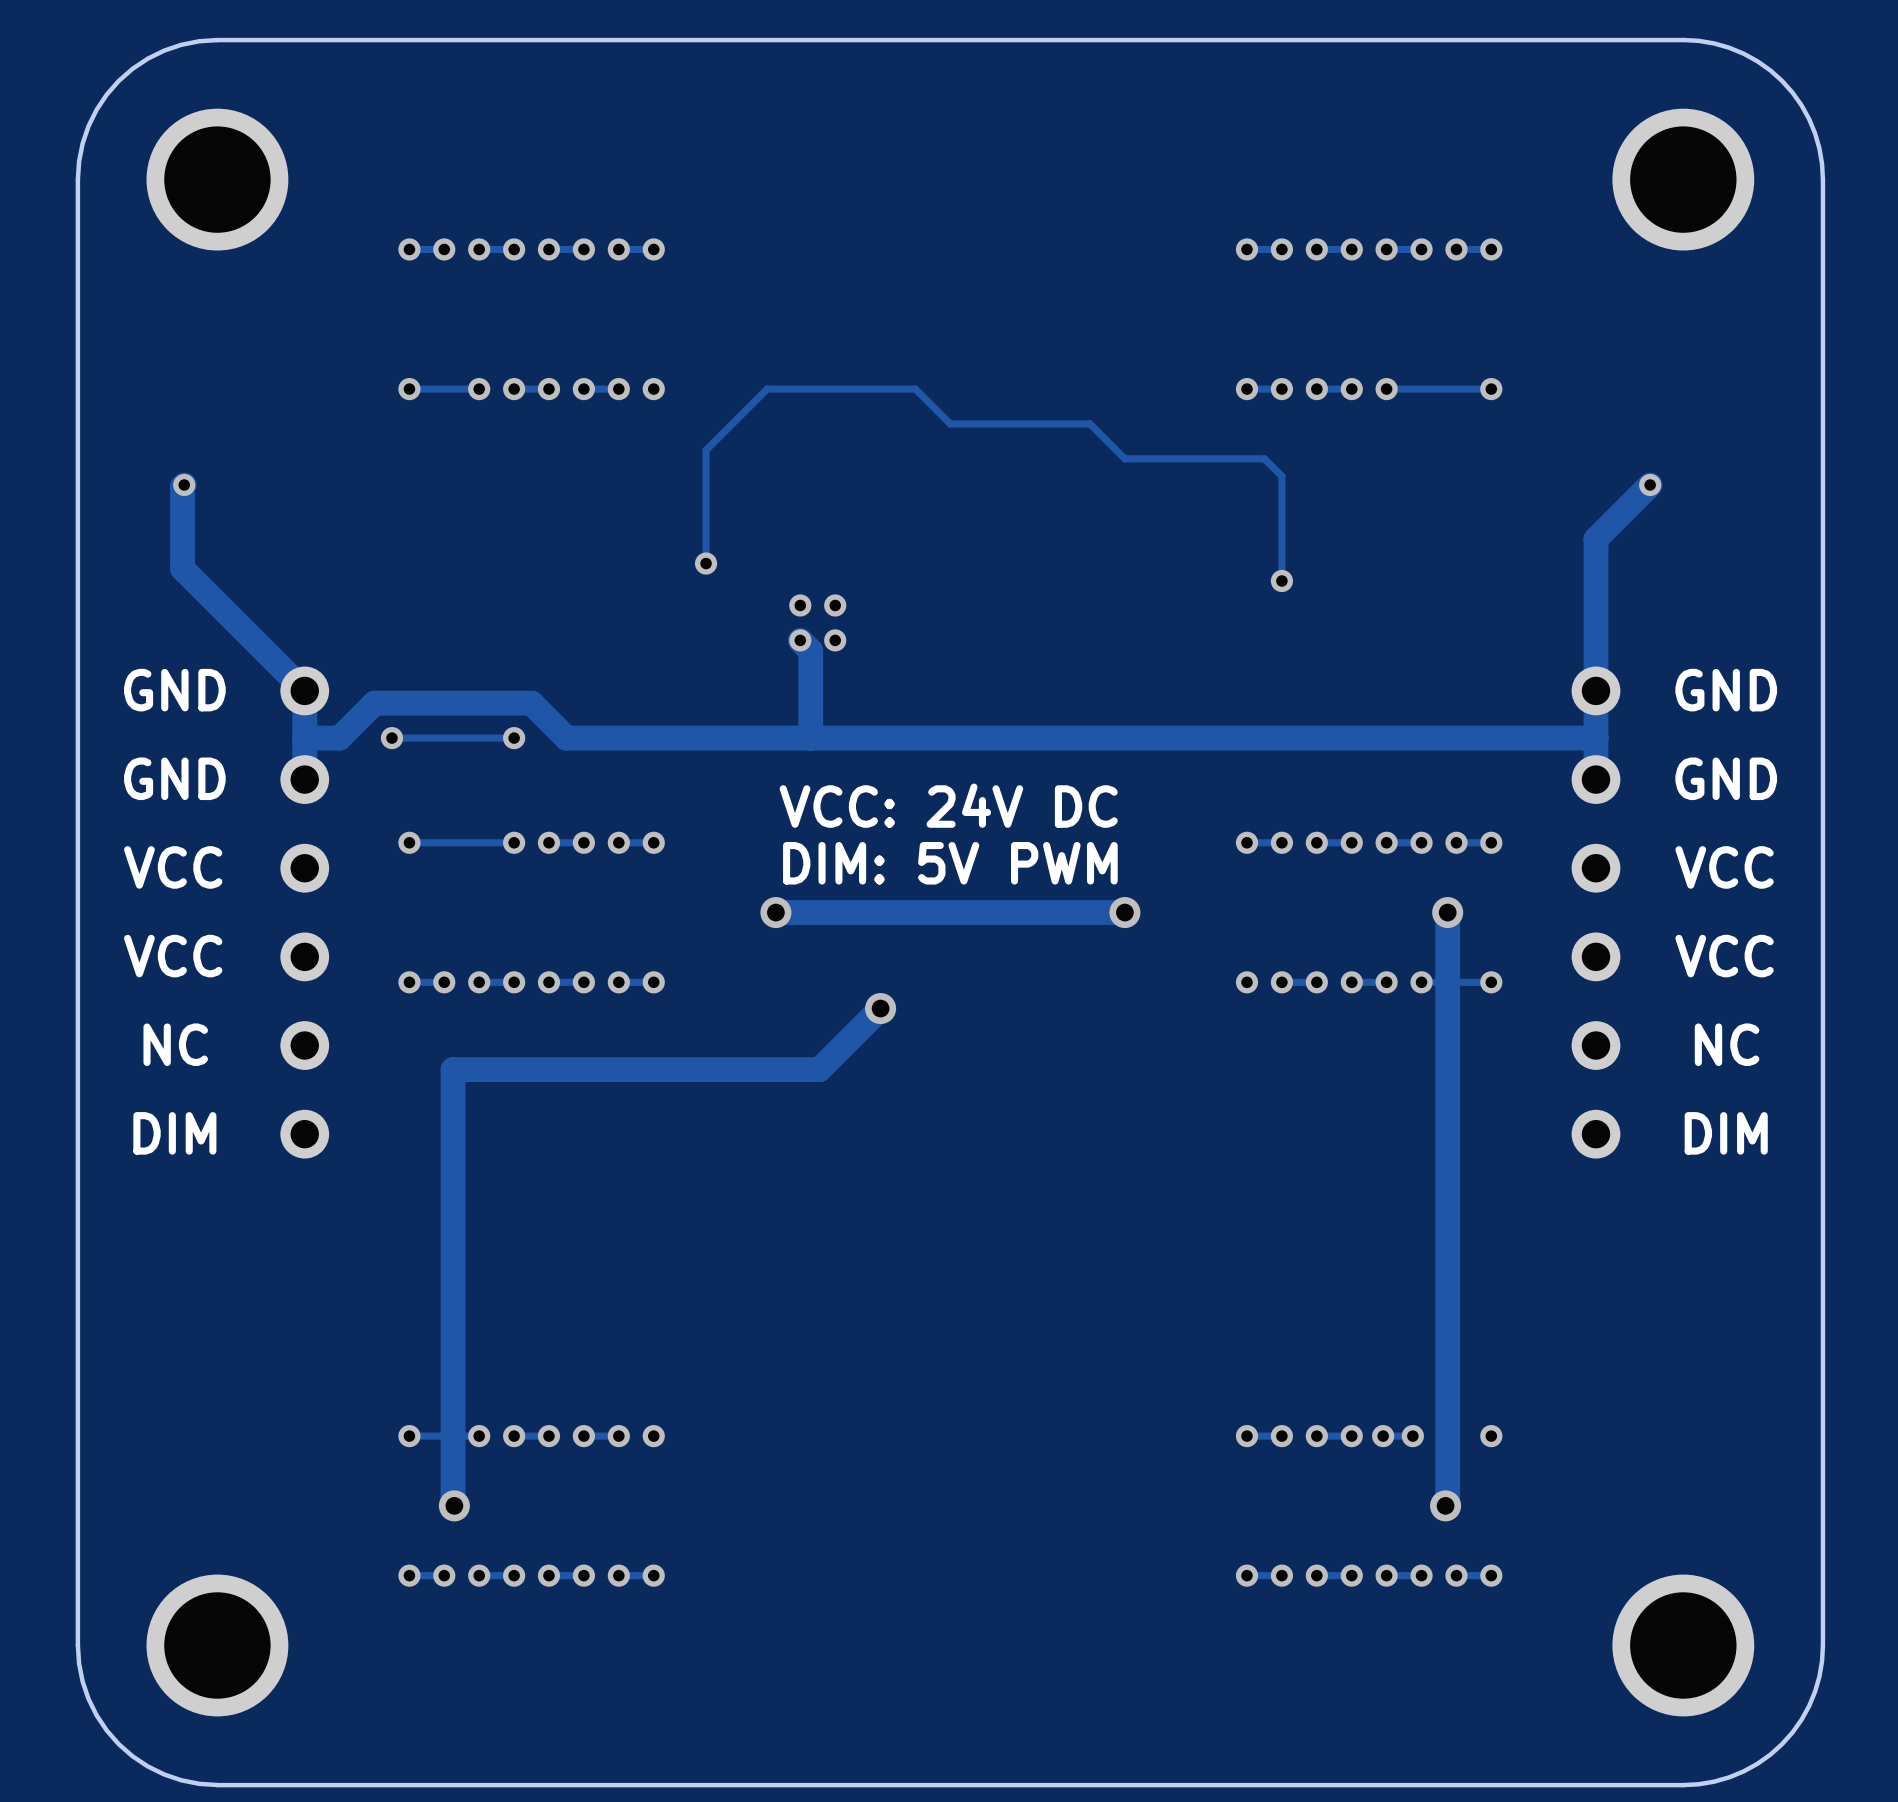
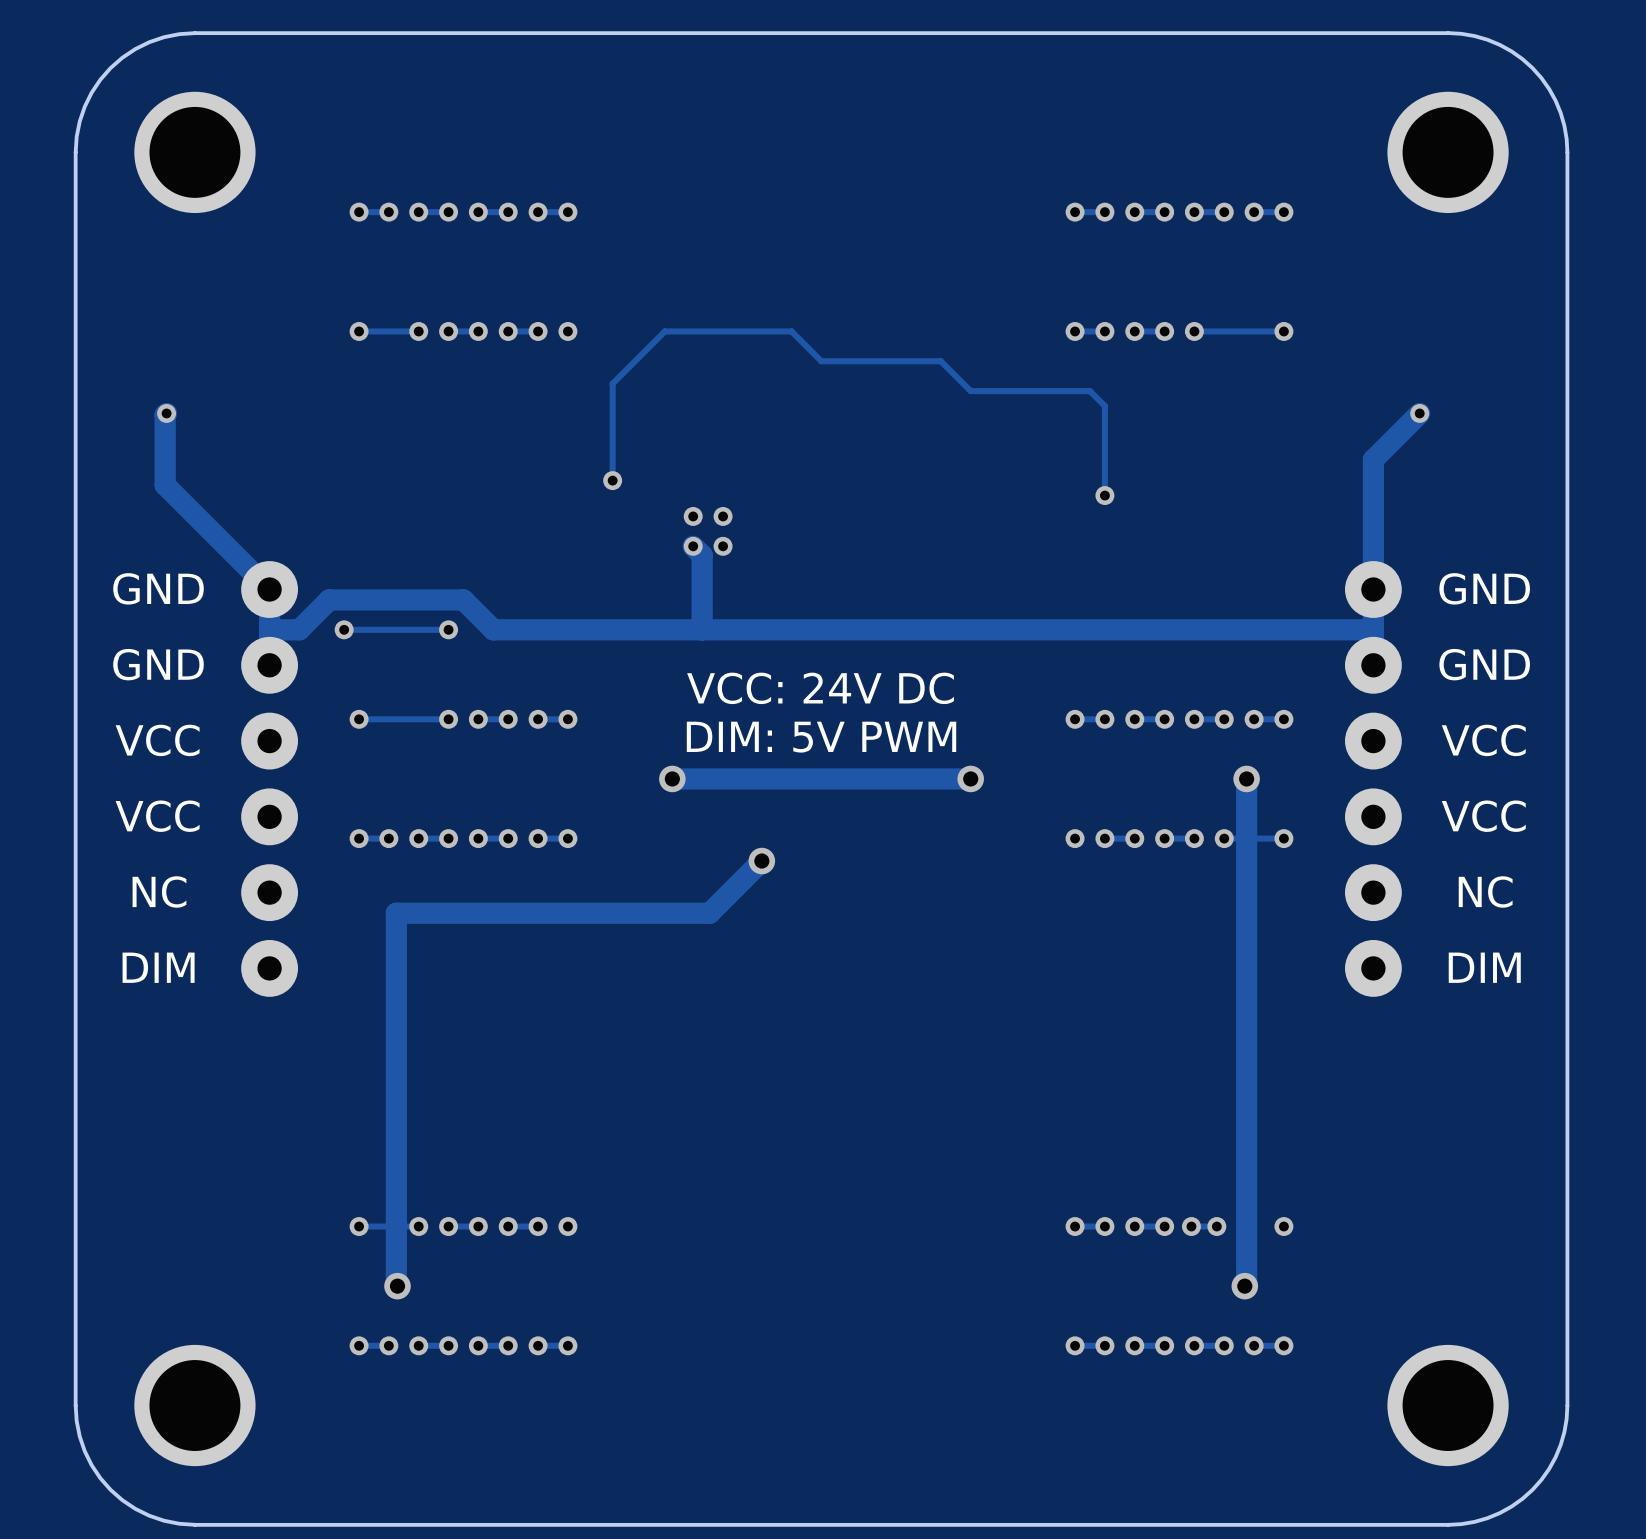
part footprint: [280, 666, 330, 1159] -> [241, 561, 299, 997]
part footprint: [1571, 666, 1621, 1159] -> [1344, 561, 1402, 997]

